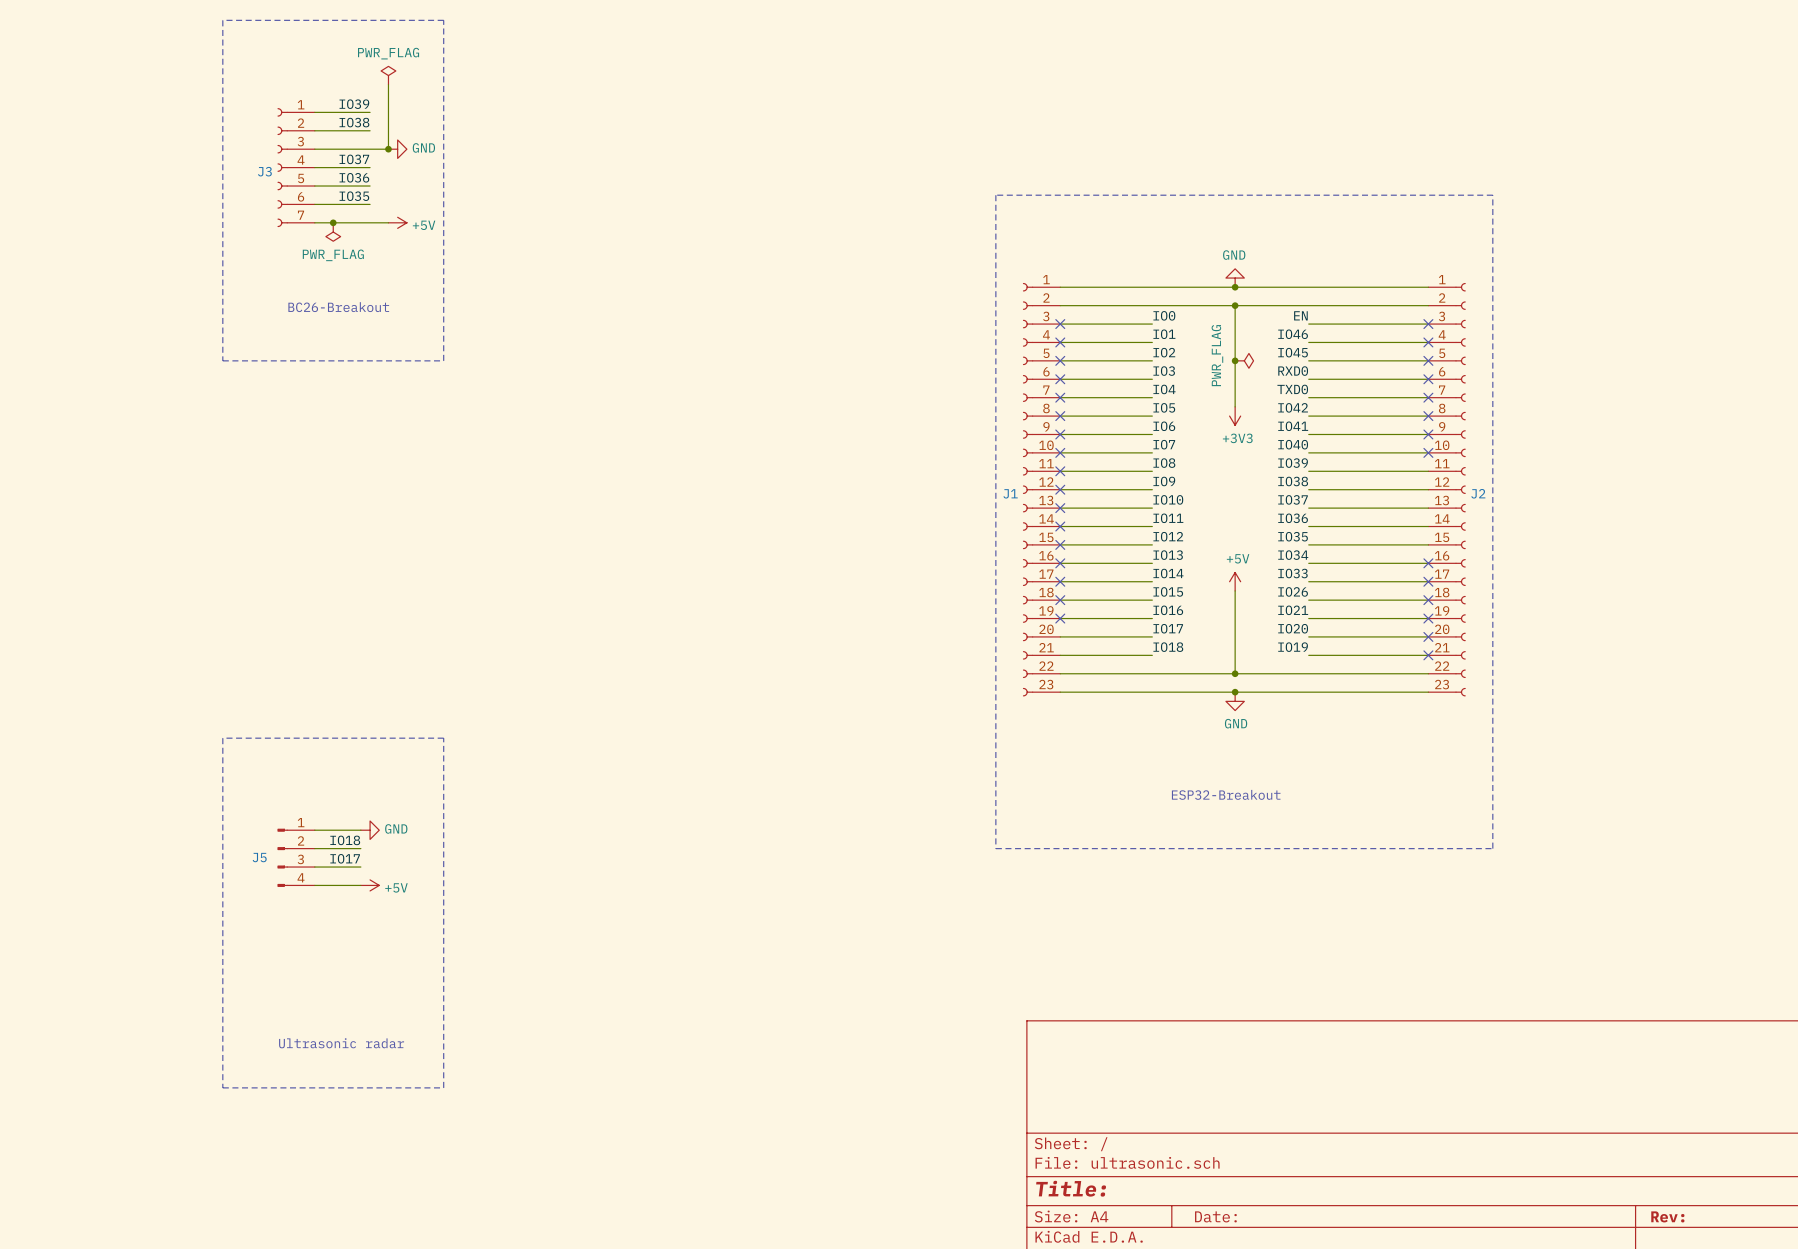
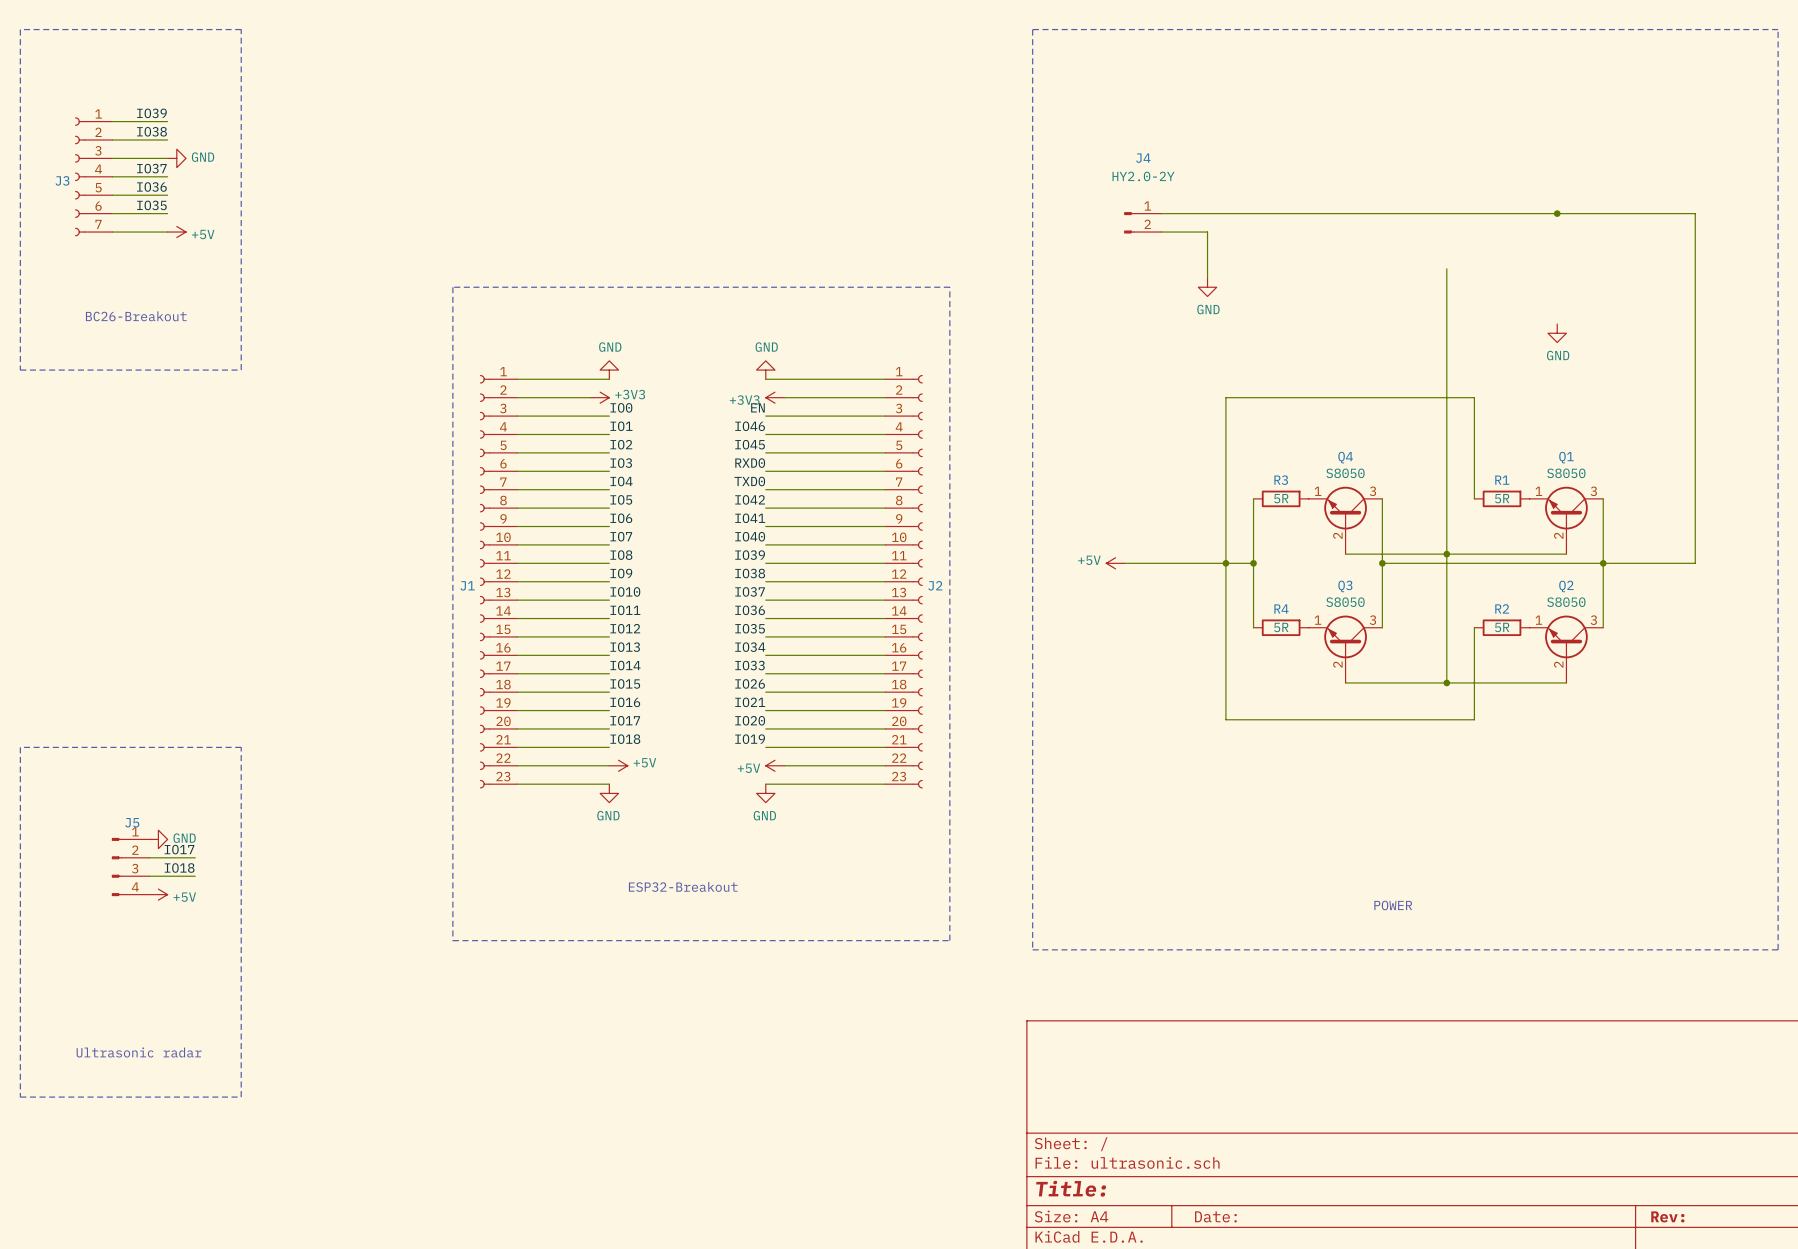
line: (222, 20) (222, 360) (443, 360) (443, 20) (222, 20) -> none
line: none -> (20, 29) (20, 370) (241, 370) (241, 29) (20, 29)
line: none -> (1032, 29) (1778, 29) (1778, 949) (1032, 949) (1032, 29)
power symbol: PWR_FLAG (388, 75) -> none
wire: (388, 84) (388, 149) (314, 149) -> none
label: IO39 (354, 104) -> none
wire: (314, 112) (370, 112) -> none
label: none -> IO39 (151, 113)
wire: none -> (112, 121) (167, 121)
label: IO38 (354, 122) -> none
wire: (314, 130) (370, 130) -> none
label: none -> IO38 (151, 131)
wire: none -> (112, 139) (167, 139)
junction: (388, 149) -> none
power symbol: GND (397, 149) -> none
wire: none -> (112, 158) (167, 158)
power symbol: none -> GND (176, 158)
label: IO37 (354, 159) -> none
J3 position: (296, 167) -> (93, 176)
wire: (314, 167) (370, 167) -> none
label: none -> IO37 (151, 168)
wire: none -> (112, 176) (167, 176)
label: IO36 (354, 177) -> none
wire: (314, 186) (370, 186) -> none
label: none -> IO36 (151, 187)
wire: none -> (112, 195) (167, 195)
line: (995, 195) (1492, 195) (1492, 848) (995, 848) (995, 195) -> none
label: IO35 (354, 196) -> none
wire: (314, 204) (370, 204) -> none
label: none -> IO35 (151, 205)
wire: none -> (112, 213) (167, 213)
wire: none -> (1161, 213) (1695, 213) (1695, 563) (1428, 563)
junction: none -> (1557, 213)
wire: (314, 222) (388, 222) -> none
junction: (333, 222) -> none
power symbol: +5V (397, 222) -> none
J4: none -> HY2.0-2Y (1142, 222)
wire: none -> (112, 232) (167, 232)
power symbol: none -> +5V (176, 232)
power symbol: PWR_FLAG (333, 232) -> none
wire: none -> (1161, 232) (1207, 232) (1207, 278)
wire: none -> (1446, 268) (1446, 682)
power symbol rotation: 0° (1235, 278) -> 180° (1207, 287)
power symbol position: GND (1235, 278) -> GND (1207, 287)
line: none -> (452, 287) (949, 287) (949, 940) (452, 940) (452, 287)
wire: (1060, 287) (1428, 287) -> none
junction: (1235, 287) -> none
wire: (1060, 305) (1428, 305) -> none
wire: (1235, 305) (1235, 406) -> none
junction: (1235, 305) -> none
text: BC26-Breakout (338, 307) -> none
label: IO0 (1164, 315) -> none
label: EN (1300, 315) -> none
text: none -> BC26-Breakout (136, 316)
wire: (1060, 324) (1152, 324) -> none
no-connect mark: (1060, 324) -> none
wire: (1308, 324) (1428, 324) -> none
no-connect mark: (1428, 324) -> none
power symbol: none -> GND (1557, 333)
label: IO1 (1164, 334) -> none
label: IO46 (1293, 334) -> none
wire: (1060, 342) (1152, 342) -> none
no-connect mark: (1060, 342) -> none
wire: (1308, 342) (1428, 342) -> none
no-connect mark: (1428, 342) -> none
label: IO2 (1164, 352) -> none
label: IO45 (1293, 352) -> none
wire: (1060, 360) (1152, 360) -> none
no-connect mark: (1060, 360) -> none
junction: (1235, 360) -> none
power symbol: PWR_FLAG (1244, 360) -> none
wire: (1308, 360) (1428, 360) -> none
no-connect mark: (1428, 360) -> none
power symbol: none -> GND (609, 370)
power symbol: none -> GND (765, 370)
label: IO3 (1164, 371) -> none
label: RXD0 (1293, 371) -> none
wire: none -> (517, 379) (609, 379)
wire: none -> (765, 379) (885, 379)
wire: (1060, 379) (1152, 379) -> none
no-connect mark: (1060, 379) -> none
wire: (1308, 379) (1428, 379) -> none
no-connect mark: (1428, 379) -> none
label: IO4 (1164, 389) -> none
label: TXD0 (1292, 389) -> none
wire: none -> (517, 397) (590, 397)
power symbol: none -> +3V3 (600, 397)
power symbol: none -> +3V3 (774, 397)
wire: none -> (784, 397) (885, 397)
wire: (1060, 397) (1152, 397) -> none
no-connect mark: (1060, 397) -> none
wire: none -> (1308, 397) (1225, 397) (1225, 719) (1474, 719) (1474, 627)
wire: none -> (1428, 397) (1474, 397) (1474, 498)
no-connect mark: (1428, 397) -> none
label: none -> IO0 (621, 407)
label: none -> EN (757, 407)
label: IO5 (1164, 407) -> none
label: IO42 (1293, 407) -> none
wire: none -> (517, 416) (609, 416)
wire: none -> (765, 416) (885, 416)
wire: (1060, 416) (1152, 416) -> none
no-connect mark: (1060, 416) -> none
power symbol: +3V3 (1235, 416) -> none
wire: (1308, 416) (1428, 416) -> none
no-connect mark: (1428, 416) -> none
label: none -> IO1 (621, 426)
label: none -> IO46 (750, 426)
label: IO6 (1164, 426) -> none
label: IO41 (1293, 426) -> none
wire: none -> (517, 434) (609, 434)
wire: none -> (765, 434) (885, 434)
wire: (1060, 434) (1152, 434) -> none
no-connect mark: (1060, 434) -> none
wire: (1308, 434) (1428, 434) -> none
no-connect mark: (1428, 434) -> none
label: none -> IO2 (621, 444)
label: none -> IO45 (750, 444)
label: IO7 (1164, 444) -> none
label: IO40 (1293, 444) -> none
wire: none -> (517, 452) (609, 452)
wire: none -> (765, 452) (885, 452)
wire: (1060, 452) (1152, 452) -> none
no-connect mark: (1060, 452) -> none
wire: (1308, 452) (1428, 452) -> none
no-connect mark: (1428, 452) -> none
label: none -> IO3 (621, 463)
label: none -> RXD0 (750, 463)
label: IO8 (1164, 463) -> none
label: IO39 (1293, 463) -> none
wire: none -> (517, 471) (609, 471)
wire: none -> (765, 471) (885, 471)
wire: (1060, 471) (1152, 471) -> none
no-connect mark: (1060, 471) -> none
wire: (1308, 471) (1428, 471) -> none
label: none -> IO4 (621, 481)
label: none -> TXD0 (749, 481)
label: IO9 (1164, 481) -> none
label: IO38 (1293, 481) -> none
wire: none -> (517, 489) (609, 489)
wire: none -> (765, 489) (885, 489)
J1 position: (1041, 489) -> (498, 581)
wire: (1060, 489) (1152, 489) -> none
no-connect mark: (1060, 489) -> none
wire: (1308, 489) (1428, 489) -> none
J2 position: (1447, 489) -> (904, 581)
wire: none -> (1253, 498) (1253, 627)
R3: none -> 5R (1281, 498)
wire: none -> (1382, 498) (1382, 627)
R1: none -> 5R (1502, 498)
wire: none -> (1603, 498) (1603, 627)
label: none -> IO5 (621, 499)
label: none -> IO42 (750, 499)
label: IO10 (1168, 499) -> none
label: IO37 (1293, 499) -> none
wire: none -> (517, 508) (609, 508)
wire: none -> (765, 508) (885, 508)
wire: (1060, 508) (1152, 508) -> none
no-connect mark: (1060, 508) -> none
wire: (1308, 508) (1428, 508) -> none
label: none -> IO6 (621, 518)
label: none -> IO41 (750, 518)
label: IO11 (1168, 518) -> none
label: IO36 (1293, 518) -> none
Q4: none -> S8050 (1345, 520)
Q1: none -> S8050 (1566, 520)
wire: none -> (517, 526) (609, 526)
wire: none -> (765, 526) (885, 526)
wire: (1060, 526) (1152, 526) -> none
no-connect mark: (1060, 526) -> none
wire: (1308, 526) (1428, 526) -> none
label: none -> IO7 (621, 536)
label: none -> IO40 (750, 536)
label: IO12 (1168, 536) -> none
label: IO35 (1293, 536) -> none
wire: none -> (517, 544) (609, 544)
wire: none -> (765, 544) (885, 544)
wire: (1060, 544) (1152, 544) -> none
no-connect mark: (1060, 544) -> none
wire: (1308, 544) (1428, 544) -> none
wire: none -> (1345, 554) (1566, 554)
junction: none -> (1446, 554)
label: none -> IO8 (621, 555)
label: none -> IO39 (750, 555)
label: IO13 (1168, 555) -> none
label: IO34 (1293, 555) -> none
wire: none -> (517, 563) (609, 563)
wire: none -> (765, 563) (885, 563)
wire: (1060, 563) (1124, 563) -> none
no-connect mark: (1060, 563) -> none
wire: none -> (1152, 563) (1253, 563)
junction: none -> (1225, 563)
junction: none -> (1253, 563)
wire: (1308, 563) (1382, 563) -> none
junction: none -> (1382, 563)
no-connect mark: (1428, 563) -> none
junction: none -> (1603, 563)
label: none -> IO9 (621, 573)
label: none -> IO38 (750, 573)
label: IO14 (1168, 573) -> none
label: IO33 (1292, 573) -> none
wire: none -> (517, 581) (609, 581)
wire: none -> (765, 581) (885, 581)
wire: (1060, 581) (1152, 581) -> none
no-connect mark: (1060, 581) -> none
power symbol rotation: 0° (1235, 581) -> 90° counterclockwise (1115, 563)
power symbol position: +5V (1235, 581) -> +5V (1115, 563)
wire: (1308, 581) (1428, 581) -> none
no-connect mark: (1428, 581) -> none
wire: (1235, 590) (1235, 673) -> none
label: none -> IO10 (625, 591)
label: none -> IO37 (750, 591)
label: IO15 (1168, 591) -> none
label: IO26 (1293, 591) -> none
wire: none -> (517, 600) (609, 600)
wire: none -> (765, 600) (885, 600)
wire: (1060, 600) (1152, 600) -> none
no-connect mark: (1060, 600) -> none
wire: (1308, 600) (1428, 600) -> none
no-connect mark: (1428, 600) -> none
label: none -> IO11 (625, 610)
label: none -> IO36 (750, 610)
label: IO16 (1168, 610) -> none
label: IO21 (1293, 610) -> none
wire: none -> (517, 618) (609, 618)
wire: none -> (765, 618) (885, 618)
wire: (1060, 618) (1152, 618) -> none
no-connect mark: (1060, 618) -> none
wire: (1308, 618) (1428, 618) -> none
no-connect mark: (1428, 618) -> none
R4: none -> 5R (1281, 627)
R2: none -> 5R (1502, 627)
label: none -> IO12 (625, 628)
label: none -> IO35 (750, 628)
label: IO17 (1168, 628) -> none
label: IO20 (1293, 628) -> none
wire: none -> (517, 636) (609, 636)
wire: none -> (765, 636) (885, 636)
wire: (1060, 636) (1152, 636) -> none
wire: (1308, 636) (1428, 636) -> none
no-connect mark: (1428, 636) -> none
label: none -> IO13 (625, 647)
label: none -> IO34 (750, 647)
label: IO18 (1168, 647) -> none
label: IO19 (1293, 647) -> none
Q3: none -> S8050 (1345, 649)
Q2: none -> S8050 (1566, 649)
wire: none -> (517, 655) (609, 655)
wire: none -> (765, 655) (885, 655)
wire: (1060, 655) (1152, 655) -> none
wire: (1308, 655) (1428, 655) -> none
no-connect mark: (1428, 655) -> none
label: none -> IO14 (625, 665)
label: none -> IO33 (749, 665)
wire: none -> (517, 673) (609, 673)
wire: none -> (765, 673) (885, 673)
wire: (1060, 673) (1428, 673) -> none
junction: (1235, 673) -> none
wire: none -> (1345, 682) (1566, 682)
junction: none -> (1446, 682)
label: none -> IO15 (625, 683)
label: none -> IO26 (750, 683)
wire: none -> (517, 692) (609, 692)
wire: none -> (765, 692) (885, 692)
wire: (1060, 692) (1428, 692) -> none
junction: (1235, 692) -> none
power symbol: GND (1235, 701) -> none
label: none -> IO16 (625, 702)
label: none -> IO21 (750, 702)
wire: none -> (517, 710) (609, 710)
wire: none -> (765, 710) (885, 710)
label: none -> IO17 (625, 720)
label: none -> IO20 (750, 720)
wire: none -> (517, 728) (609, 728)
wire: none -> (765, 728) (885, 728)
line: (222, 738) (222, 1087) (443, 1087) (443, 738) (222, 738) -> none
label: none -> IO18 (625, 739)
label: none -> IO19 (750, 739)
line: none -> (20, 747) (20, 1097) (241, 1097) (241, 747) (20, 747)
wire: none -> (517, 747) (609, 747)
wire: none -> (765, 747) (885, 747)
wire: none -> (517, 765) (609, 765)
power symbol: none -> +5V (618, 765)
power symbol: none -> +5V (774, 765)
wire: none -> (784, 765) (885, 765)
wire: none -> (517, 784) (609, 784)
wire: none -> (765, 784) (885, 784)
power symbol: none -> GND (609, 793)
power symbol: none -> GND (765, 793)
text: ESP32-Breakout (1226, 794) -> none
wire: (314, 830) (360, 830) -> none
power symbol: GND (370, 830) -> none
power symbol: none -> GND (158, 839)
label: IO18 (345, 840) -> none
wire: (314, 848) (360, 848) -> (149, 857) (195, 857)
label: none -> IO17 (179, 849)
J5 name position: J5 (259, 857) -> J5 (132, 822)
J5 position: (296, 857) -> (130, 867)
label: IO17 (345, 858) -> none
wire: (314, 867) (360, 867) -> (149, 876) (195, 876)
label: none -> IO18 (179, 868)
wire: (314, 885) (360, 885) -> none
power symbol: +5V (370, 885) -> none
text: none -> ESP32-Breakout (683, 886)
power symbol: none -> +5V (158, 894)
text: none -> POWER (1393, 905)
text: Ultrasonic radar (341, 1043) -> none
text: none -> Ultrasonic radar (139, 1052)

